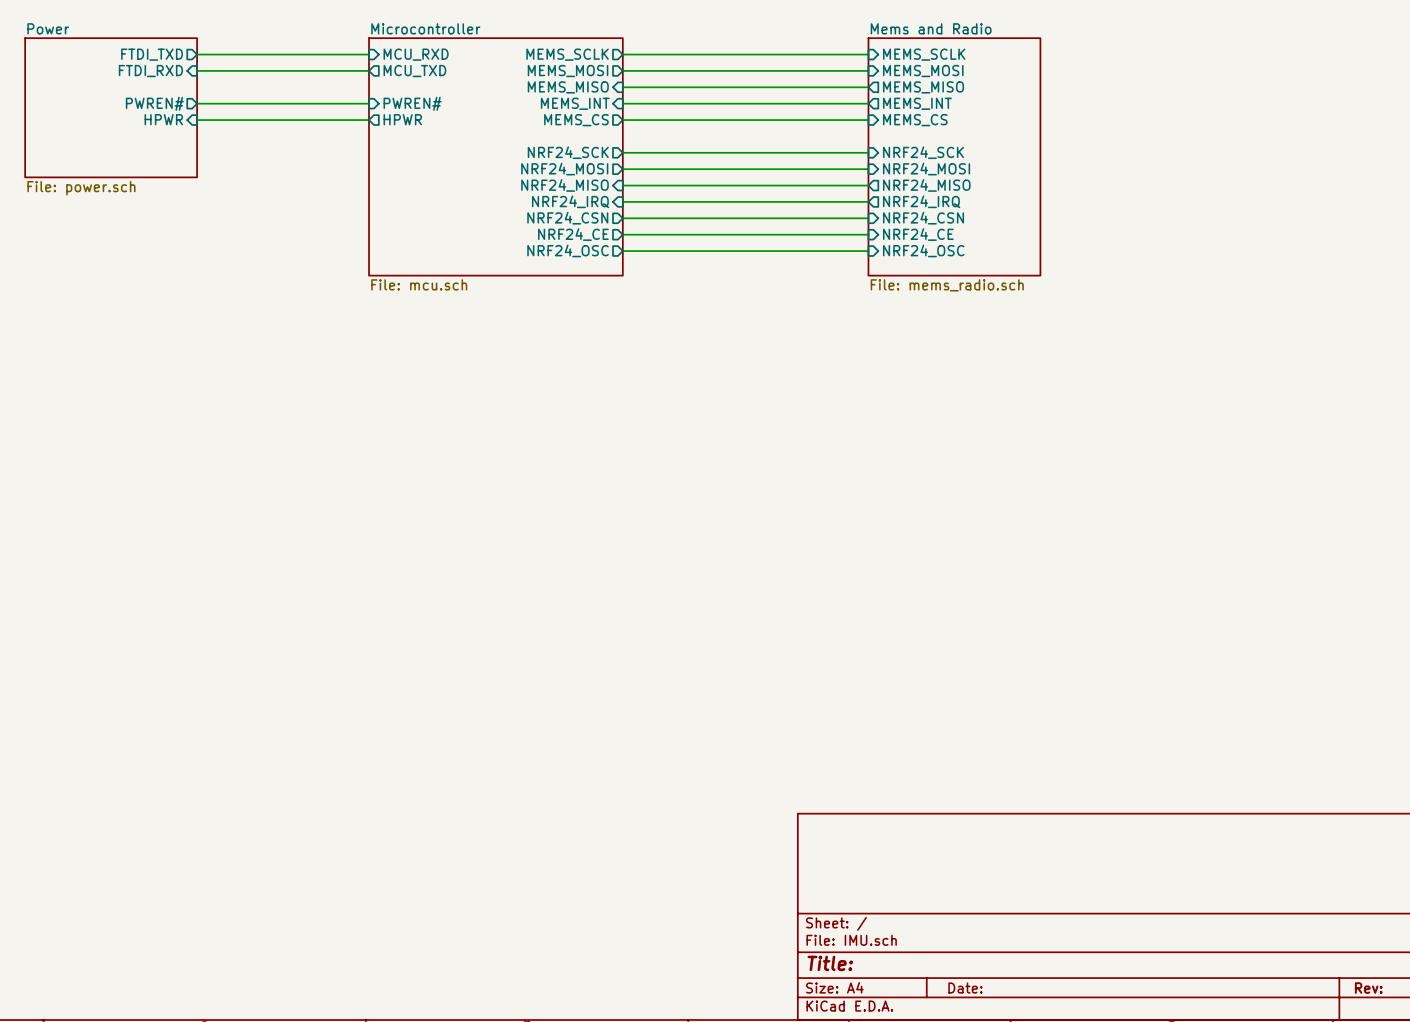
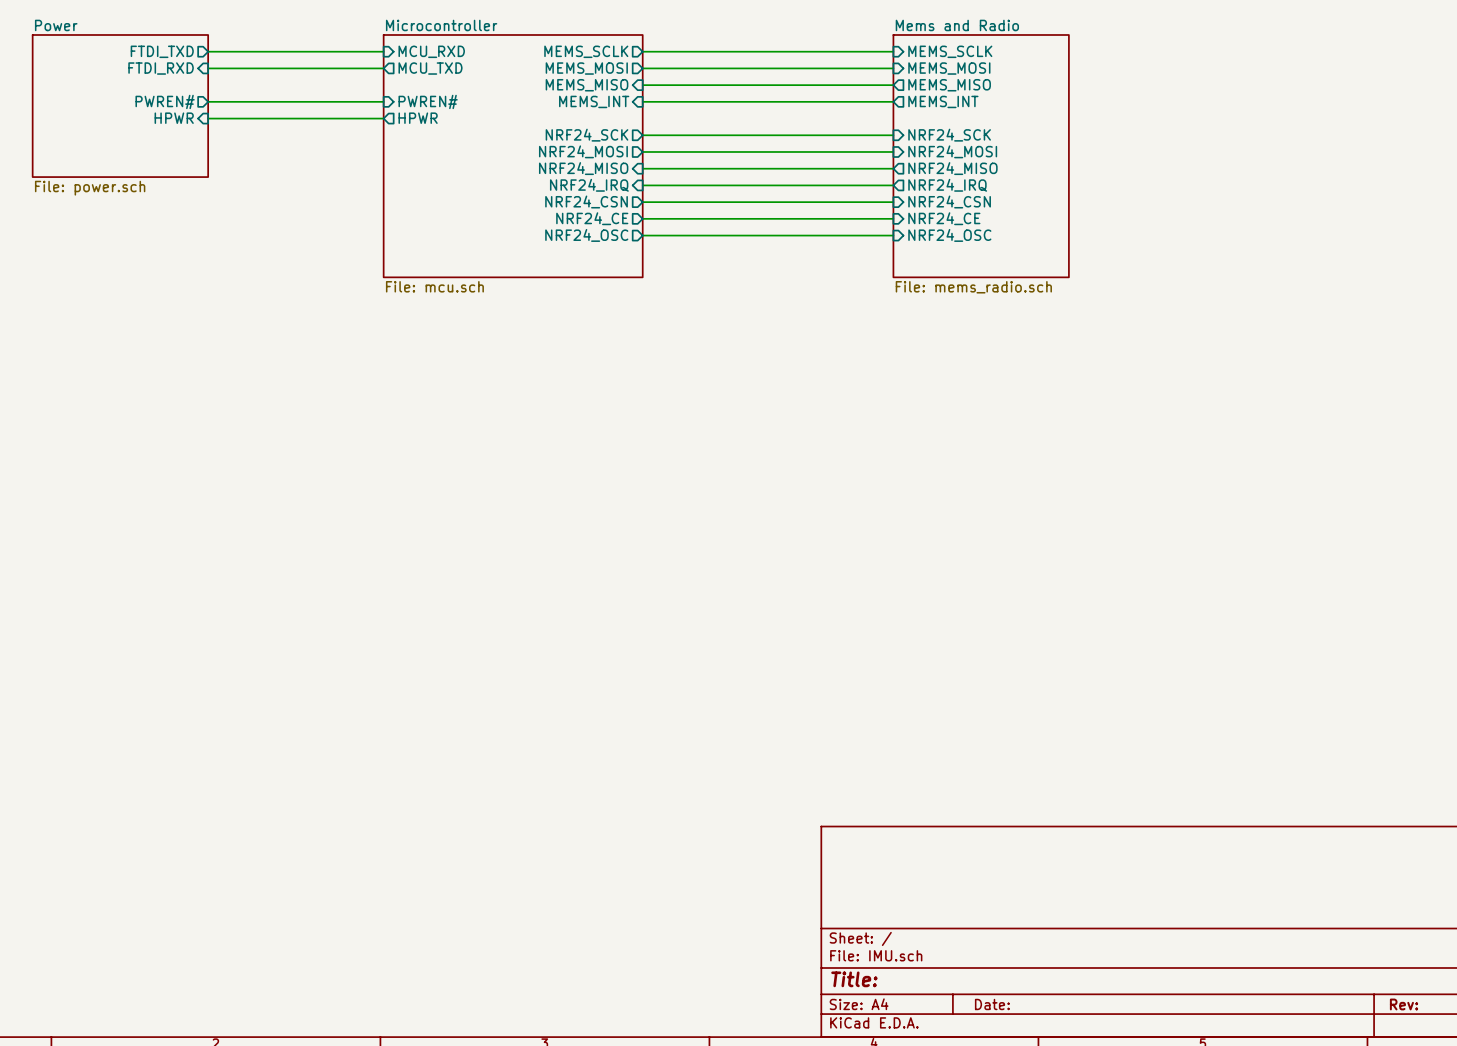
sheet pin: MEMS_CS (576, 120) -> none
wire: (622, 120) (868, 120) -> (642, 135) (893, 135)
sheet pin: MEMS_CS (915, 120) -> none
sheet pin: none -> NRF24_SCK (587, 135)
sheet pin: none -> NRF24_SCK (949, 135)
sheet pin: NRF24_SCK (568, 152) -> NRF24_MOSI (583, 151)
sheet pin: NRF24_SCK (923, 152) -> NRF24_MOSI (952, 151)
sheet pin shape: output (564, 169) -> input (583, 168)
sheet pin: NRF24_MOSI (564, 169) -> NRF24_MISO (583, 168)
sheet pin shape: input (926, 169) -> output (952, 168)
sheet pin: NRF24_MOSI (926, 169) -> NRF24_MISO (952, 168)
sheet pin: NRF24_MISO (564, 185) -> NRF24_IRQ (589, 185)
sheet pin: NRF24_MISO (926, 185) -> NRF24_IRQ (947, 185)
sheet pin shape: input (570, 201) -> output (586, 202)
sheet pin: NRF24_IRQ (570, 201) -> NRF24_CSN (586, 202)
sheet pin shape: output (921, 201) -> input (949, 202)
sheet pin: NRF24_IRQ (921, 201) -> NRF24_CSN (949, 202)
sheet pin: NRF24_CSN (567, 218) -> NRF24_CE (592, 218)
sheet pin: NRF24_CSN (923, 218) -> NRF24_CE (944, 218)
sheet pin: NRF24_CE (573, 234) -> NRF24_OSC (586, 235)
sheet pin: NRF24_CE (918, 234) -> NRF24_OSC (949, 235)
sheet pin: NRF24_OSC (568, 250) -> none
sheet pin: NRF24_OSC (923, 250) -> none
wire: (622, 251) (868, 251) -> none

